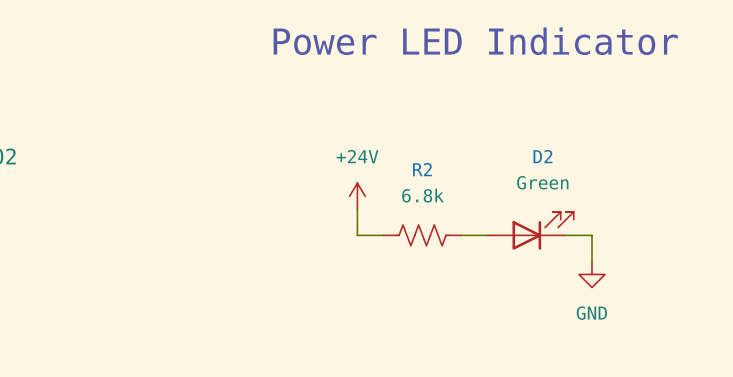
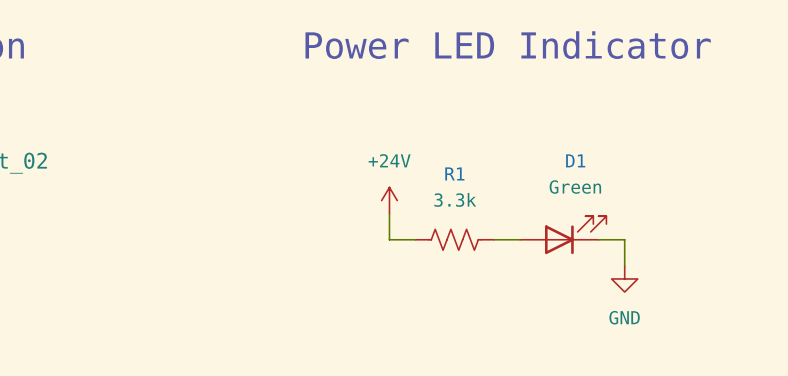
D2 name: D2 (542, 156) -> D1 (575, 160)
R2 name: R2 (422, 169) -> R1 (454, 173)
R2 value: 6.8k (423, 195) -> 3.3k (455, 199)

